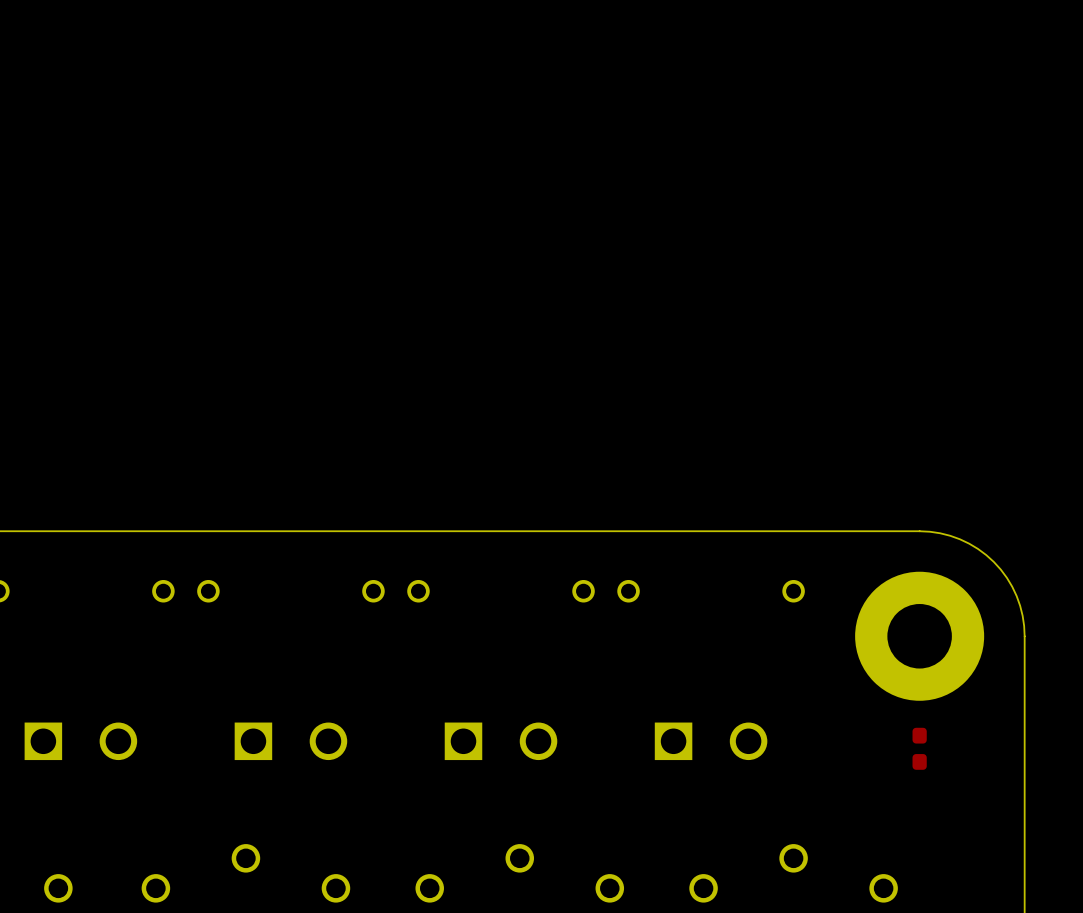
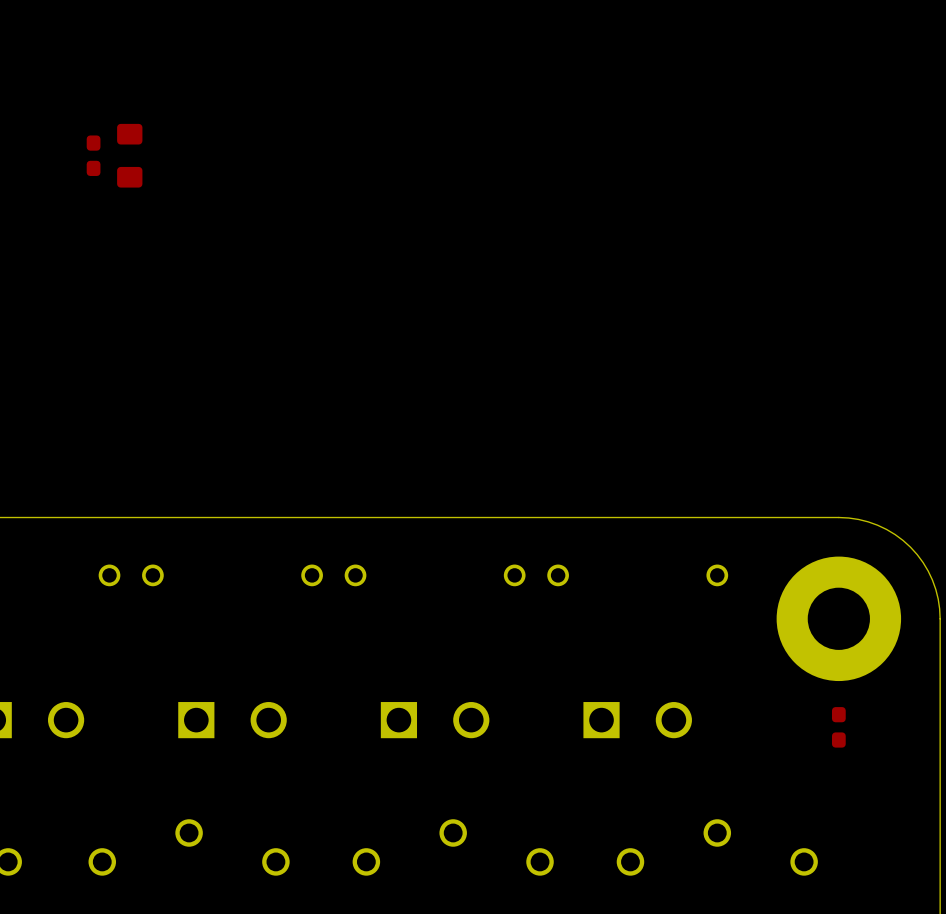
part: none -> (93, 155)
part: none -> (129, 155)

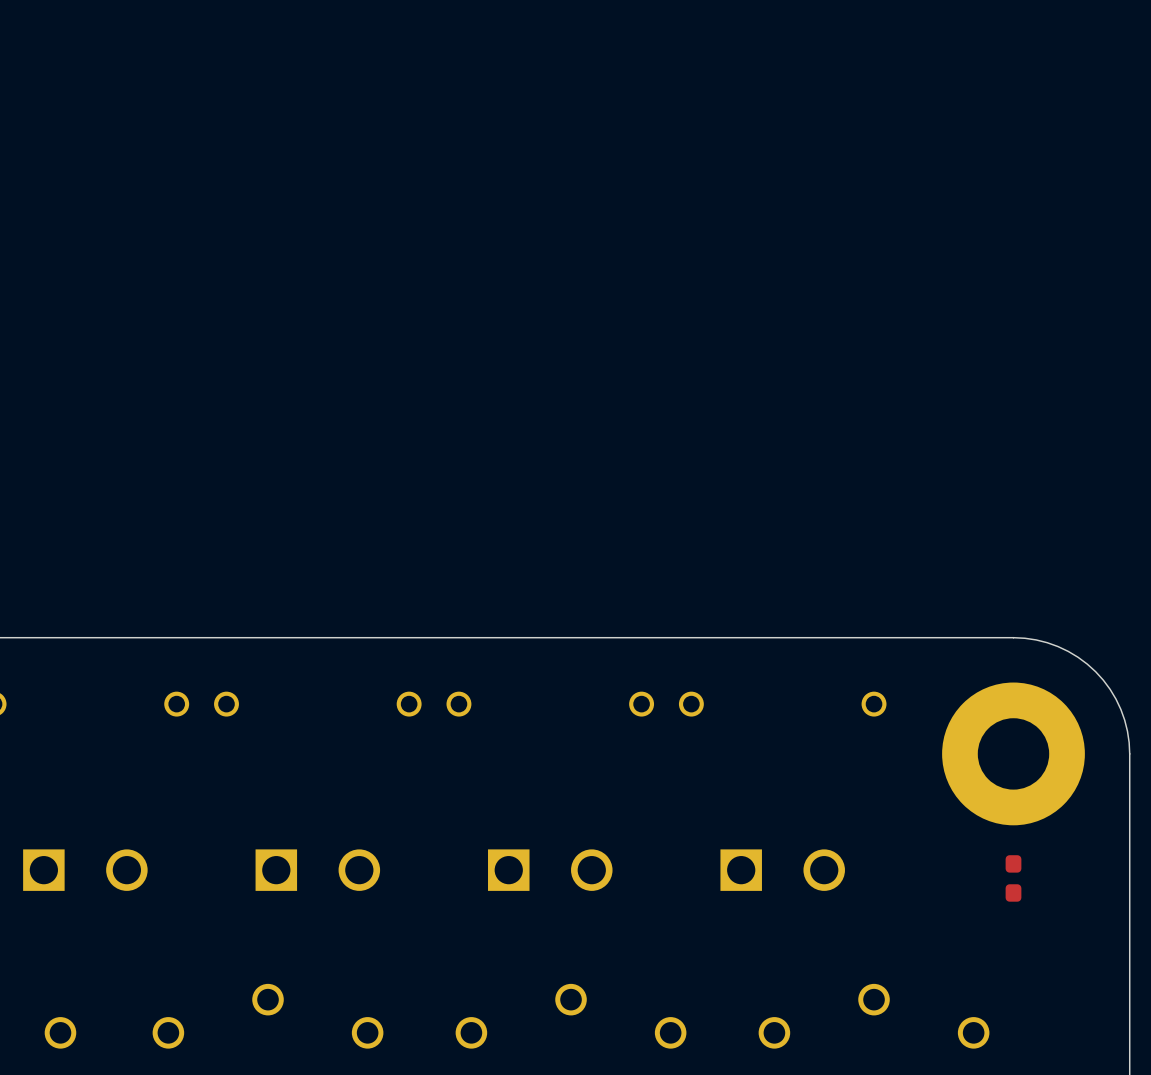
part: (93, 155) -> none
part: (129, 155) -> none

